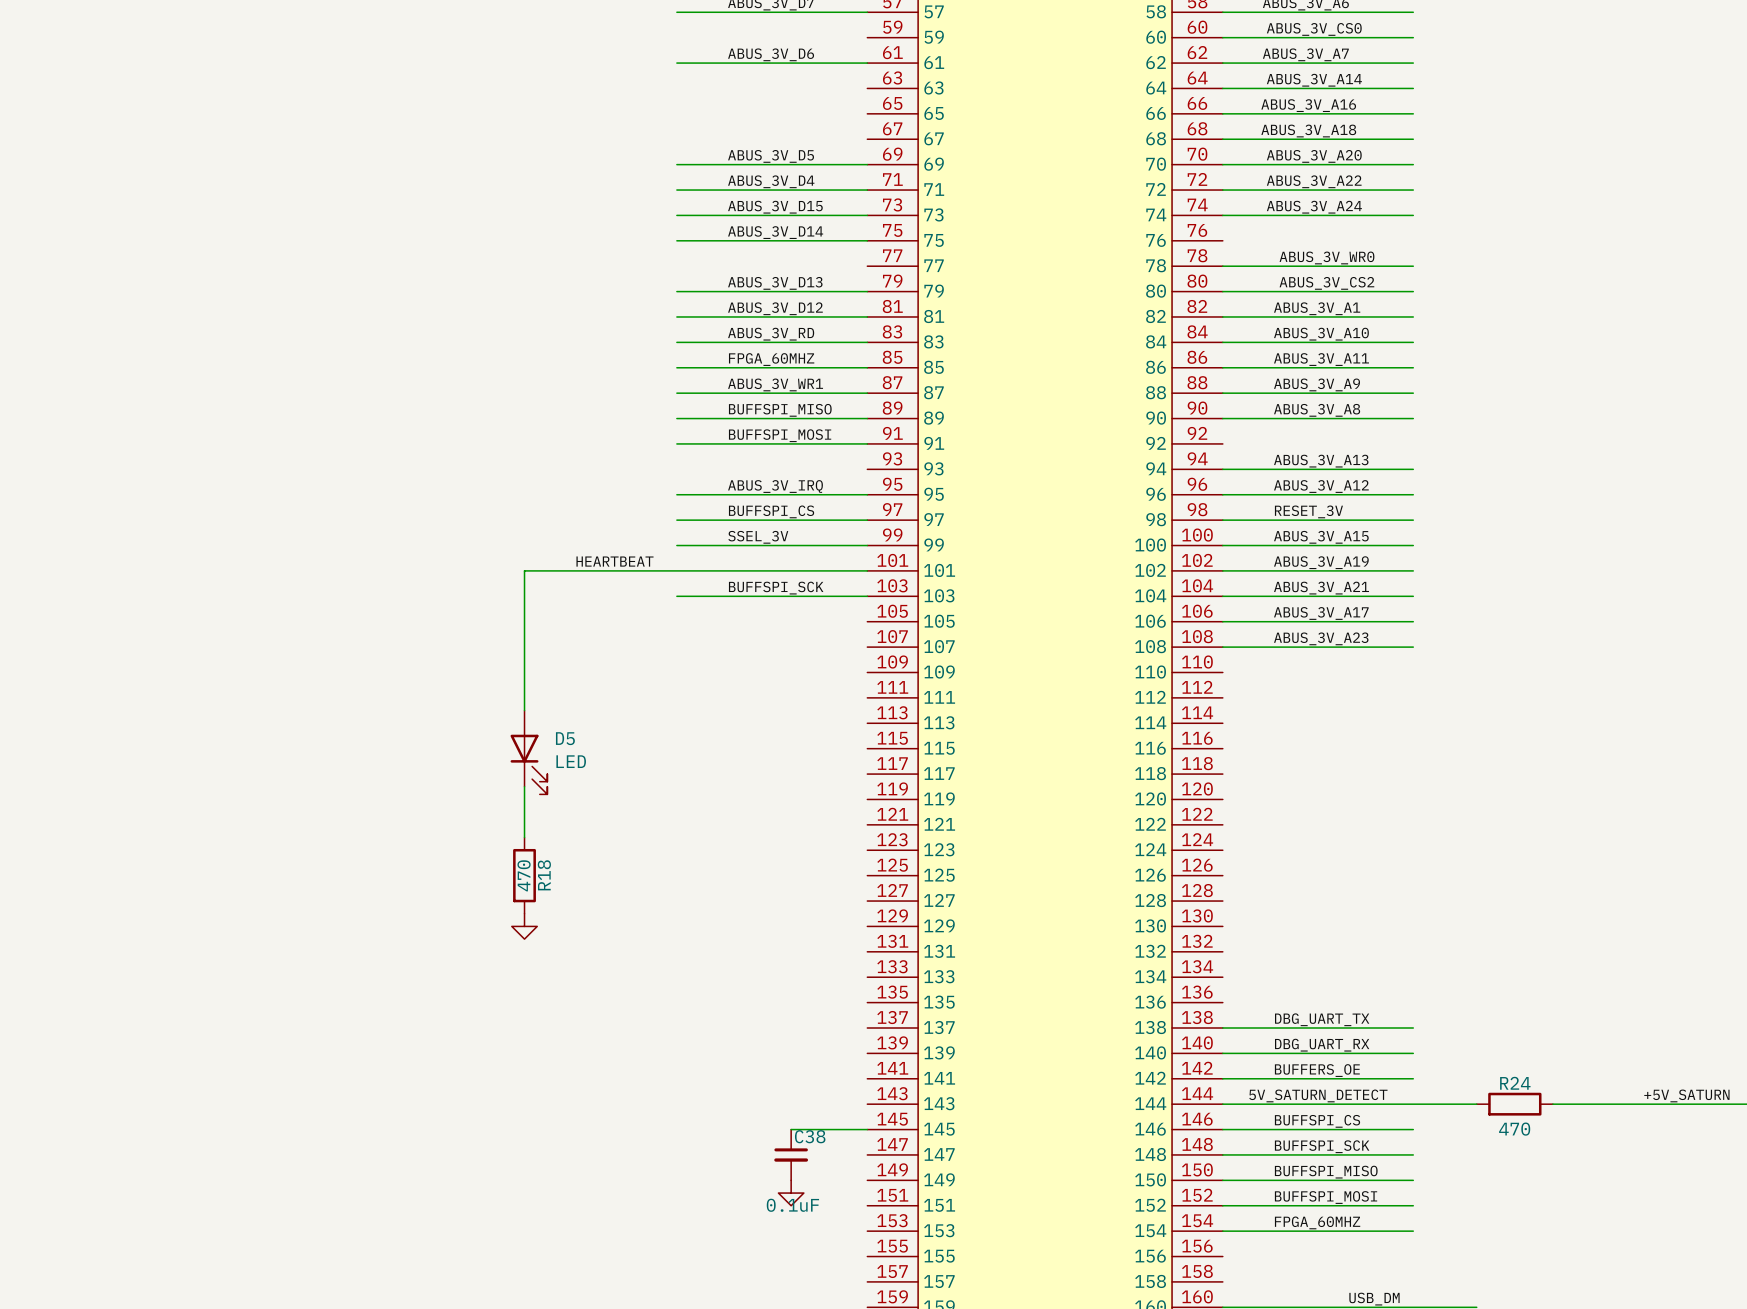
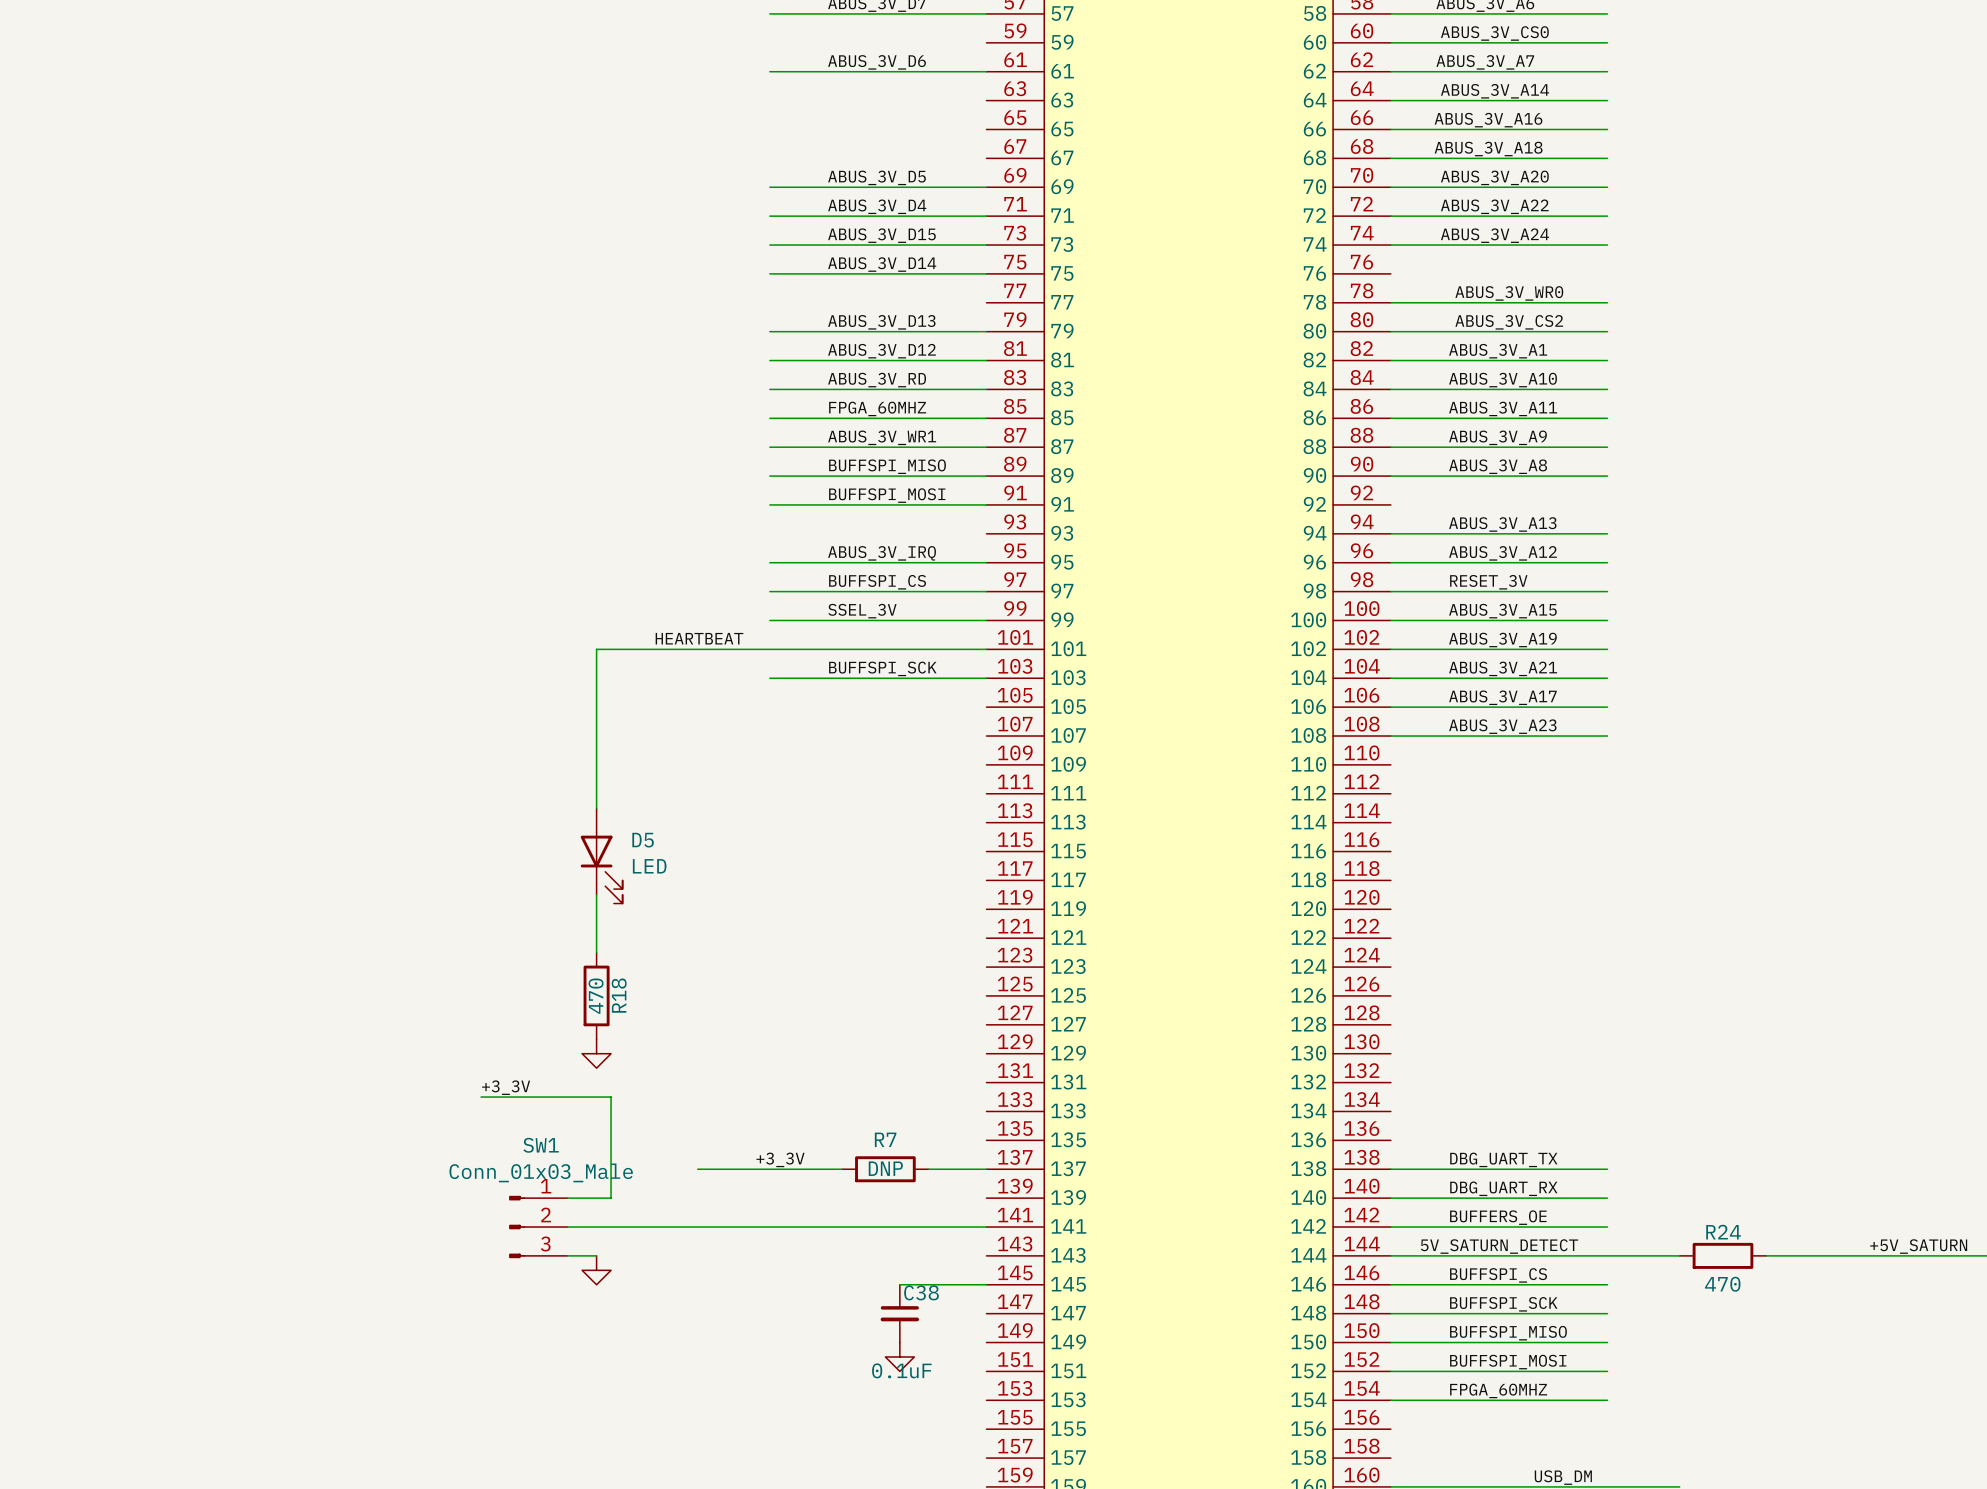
label: none -> +3_3V (506, 1087)
wire: none -> (481, 1097) (611, 1097) (611, 1198) (567, 1198)
label: none -> +3_3V (780, 1159)
wire: none -> (697, 1169) (842, 1169)
R7: none -> DNP (885, 1169)
wire: none -> (928, 1169) (986, 1169)
SW1: none -> Conn_01x03_Male (538, 1227)
wire: none -> (567, 1227) (986, 1227)
wire: none -> (567, 1255) (596, 1255)
power symbol: none -> (596, 1270)

